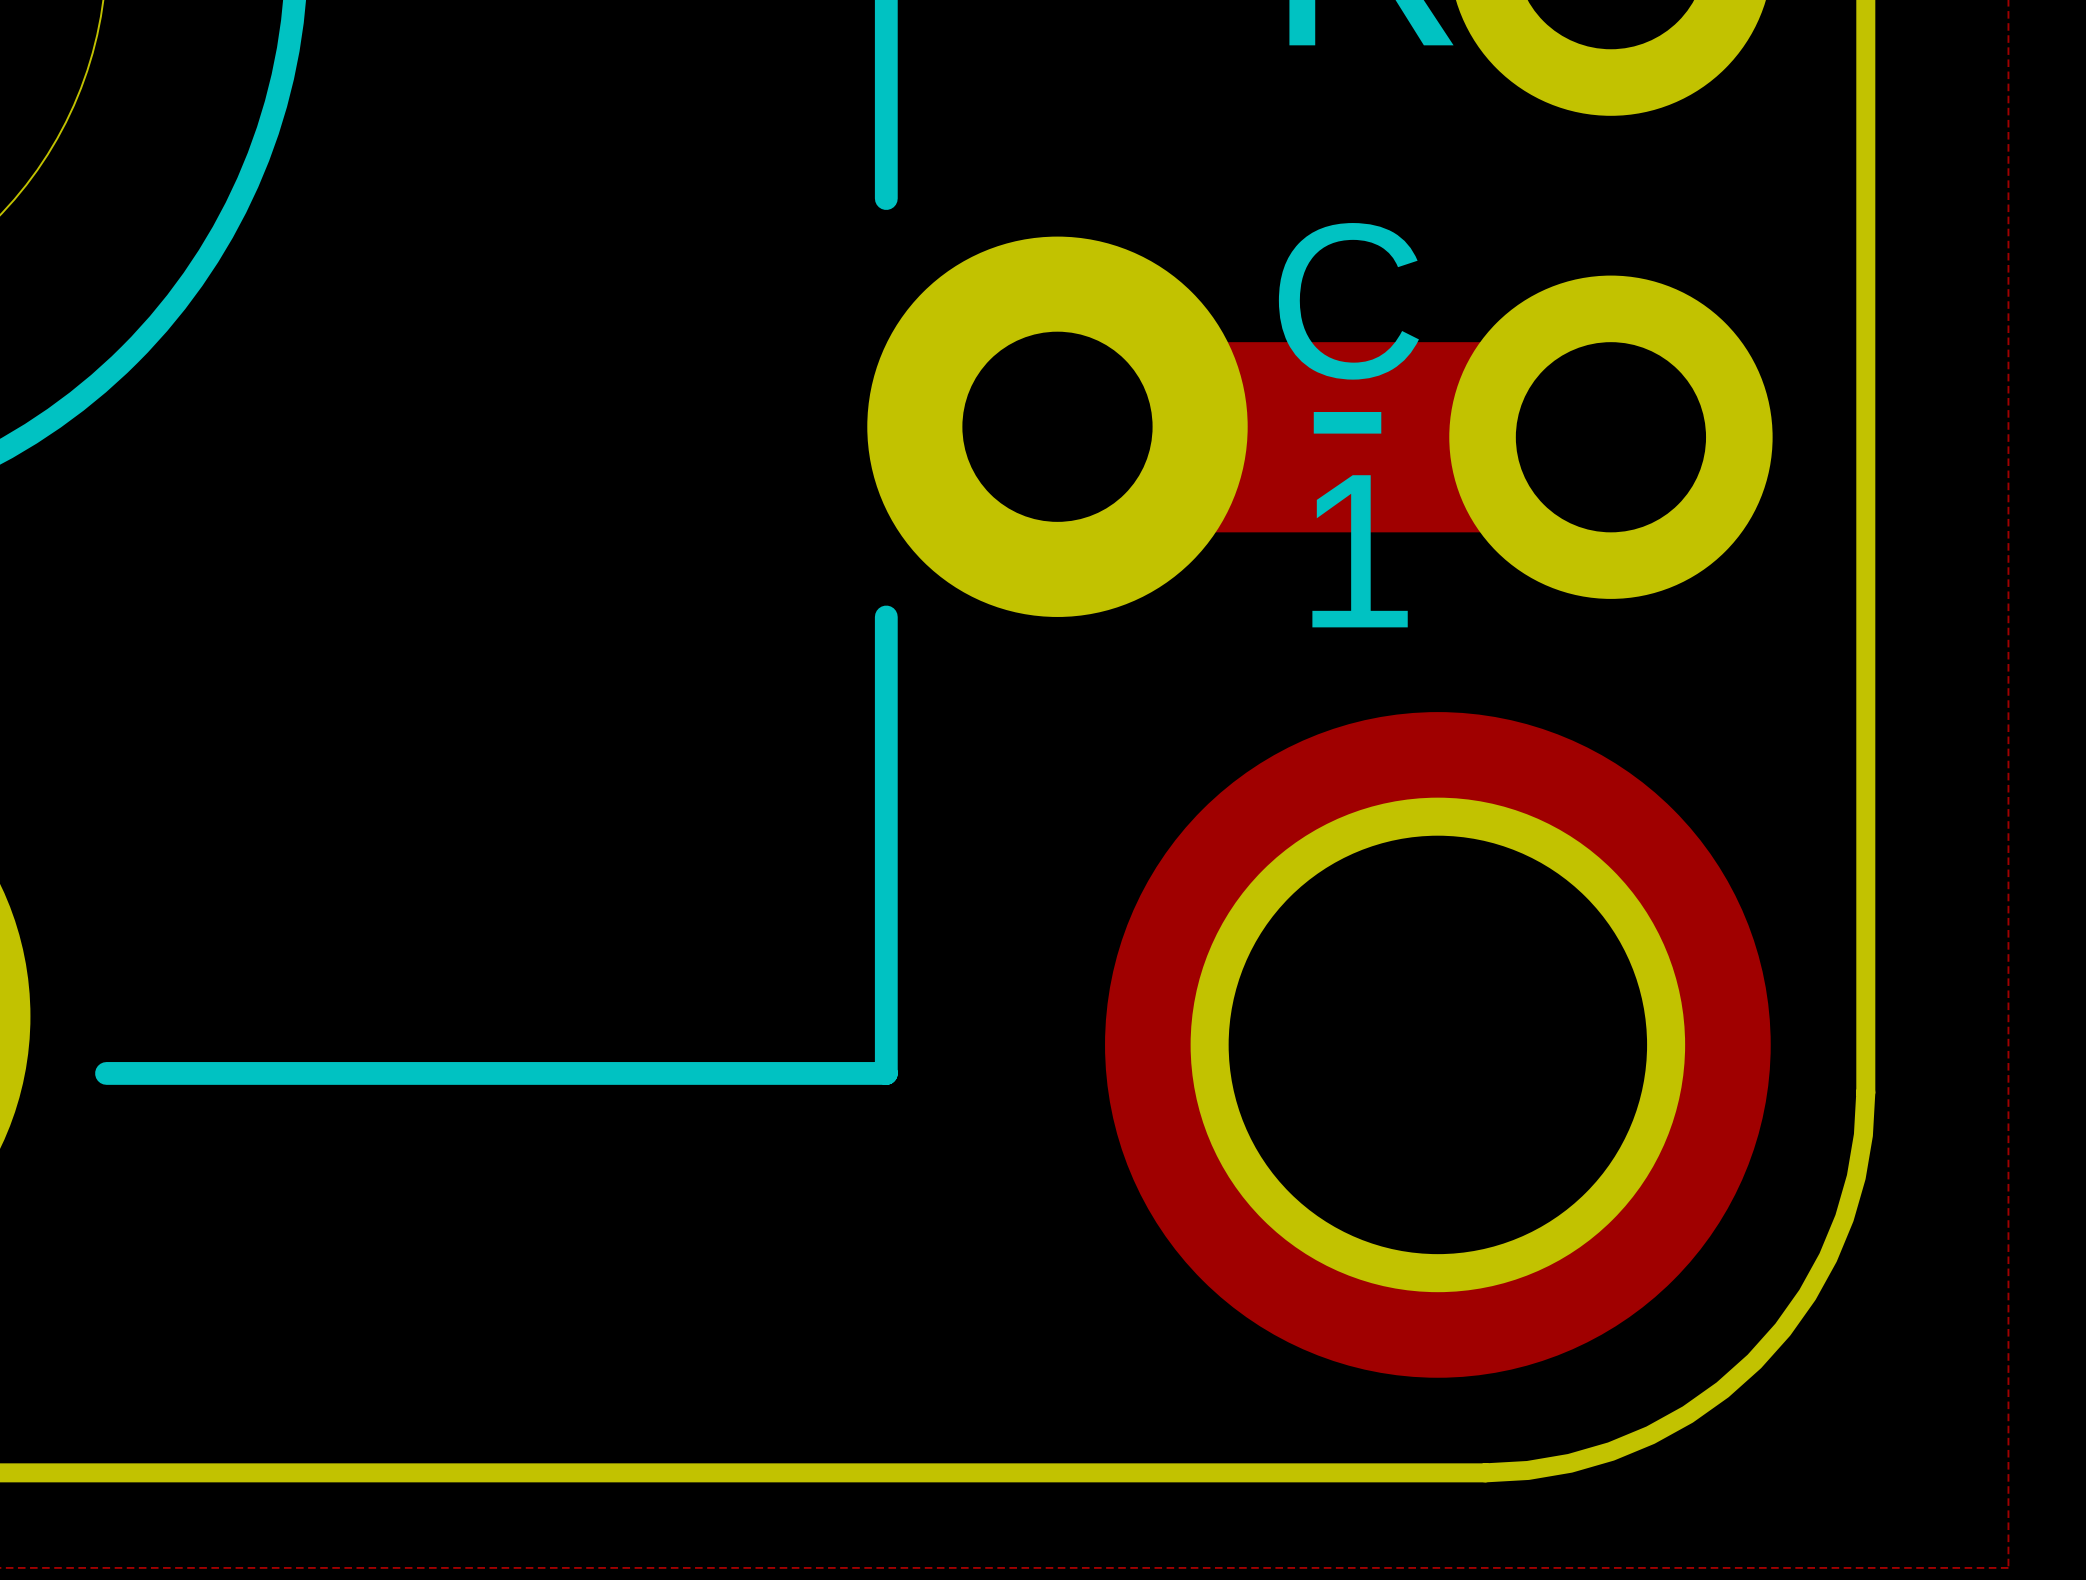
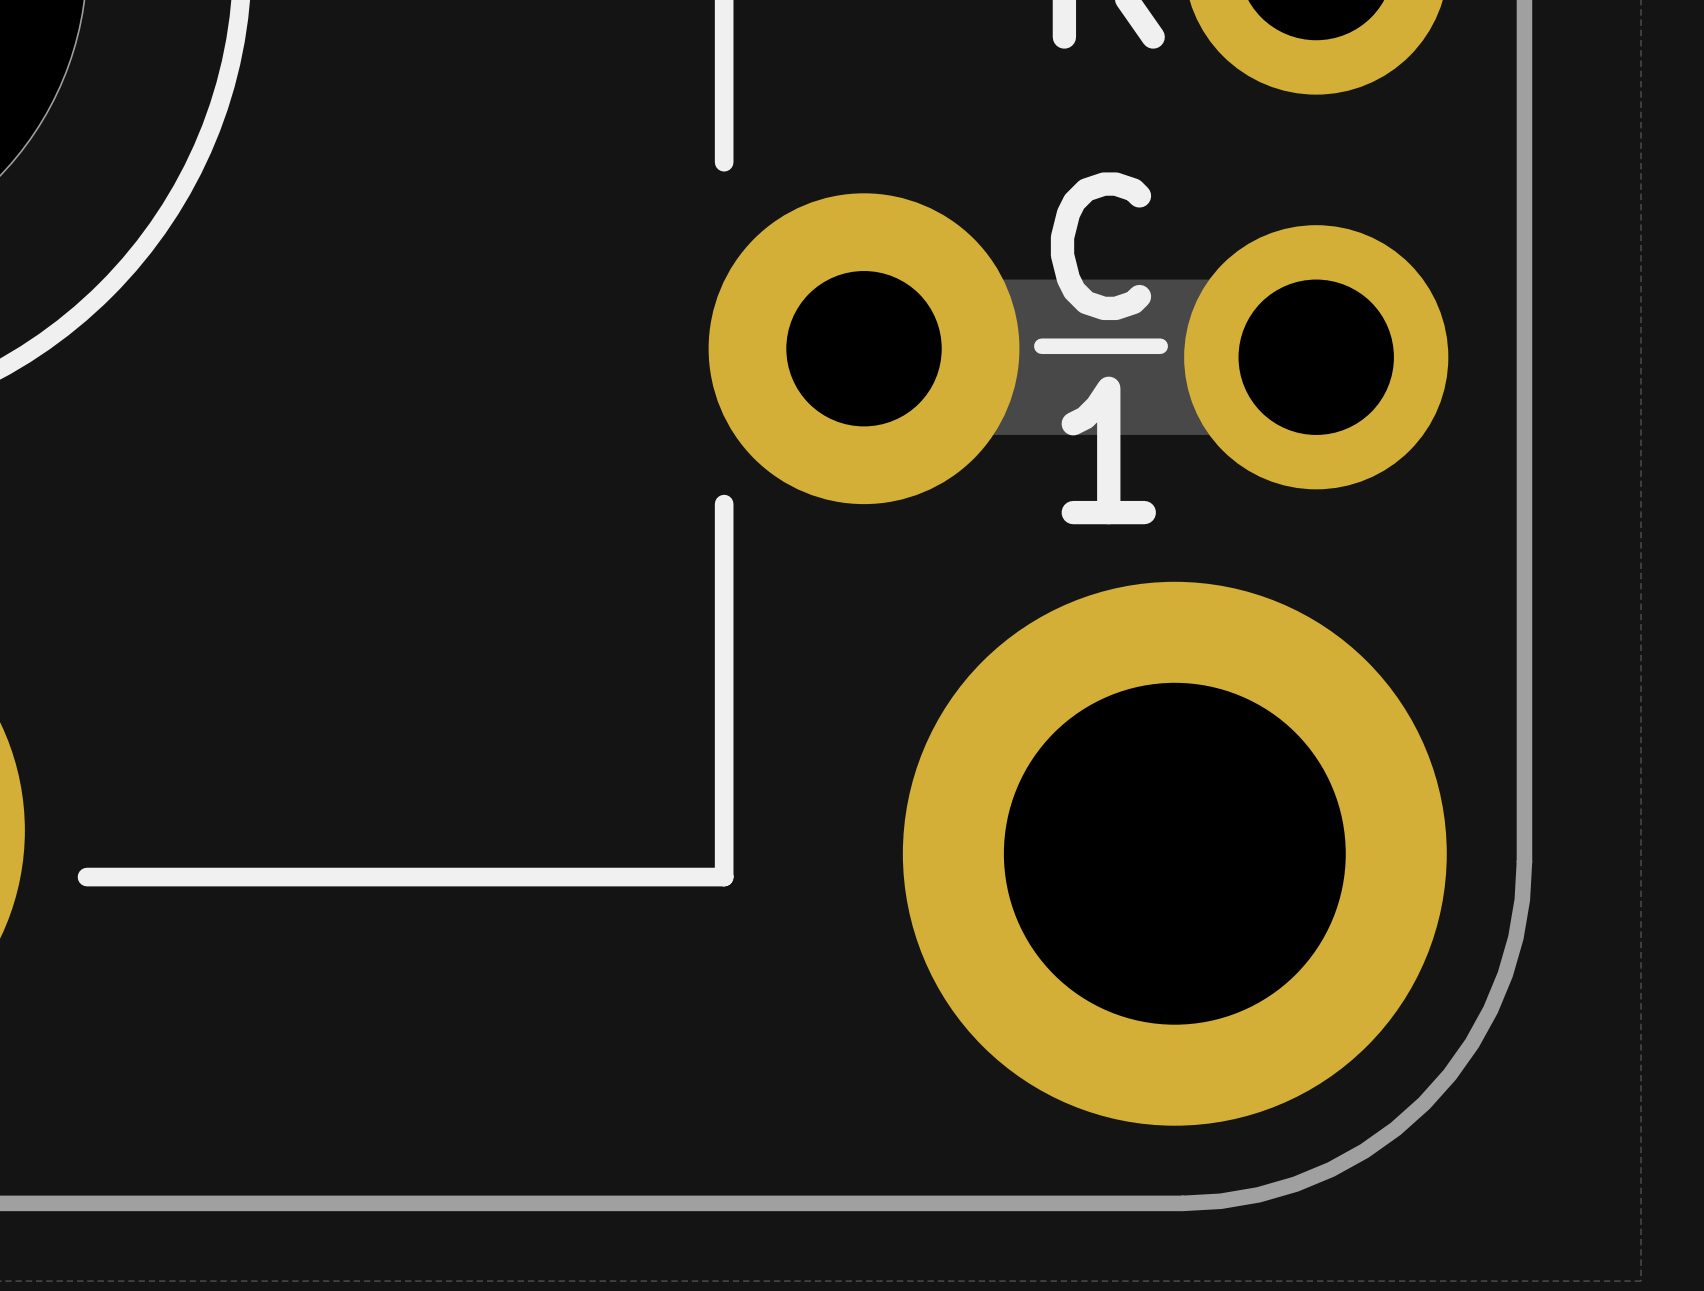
board edge: (1865, 1054) (1863, 1135) (1856, 1177) (1844, 1218) (1828, 1257) (1807, 1294) (1782, 1329) (1754, 1361) (1722, 1389) (1687, 1414) (1650, 1435) (1611, 1451) (1570, 1463) (1528, 1470) (1447, 1472) -> (1524, 861) (1522, 899) (1515, 937) (1505, 974) (1490, 1009) (1472, 1043) (1449, 1074) (1424, 1103) (1395, 1128) (1364, 1150) (1330, 1169) (1295, 1184) (1258, 1194) (1220, 1201) (1182, 1203)

